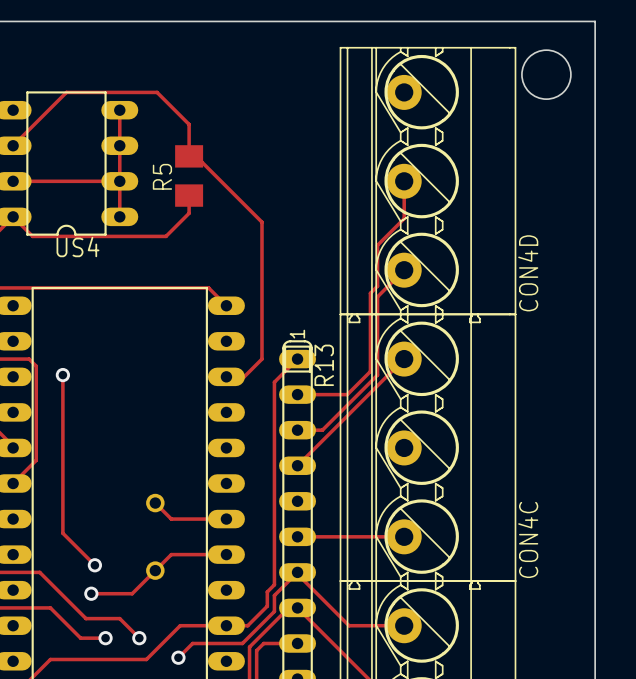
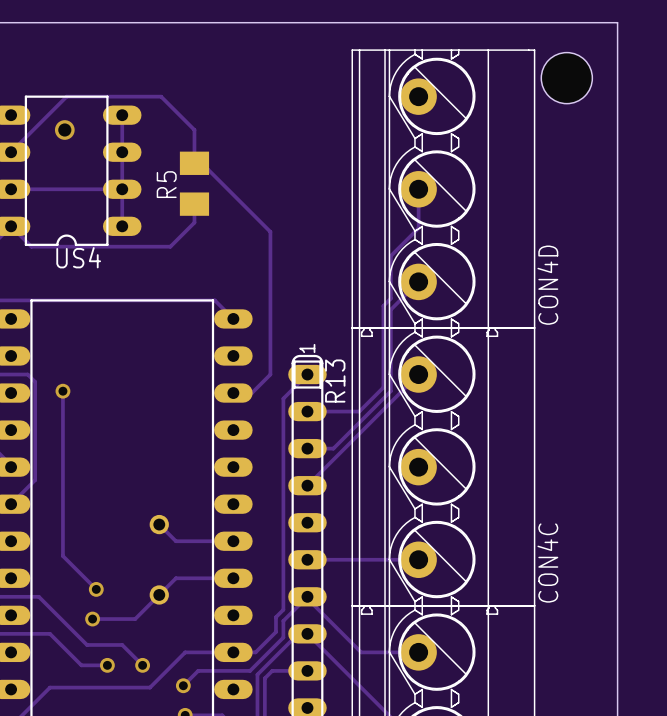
via: none -> (64, 130)

